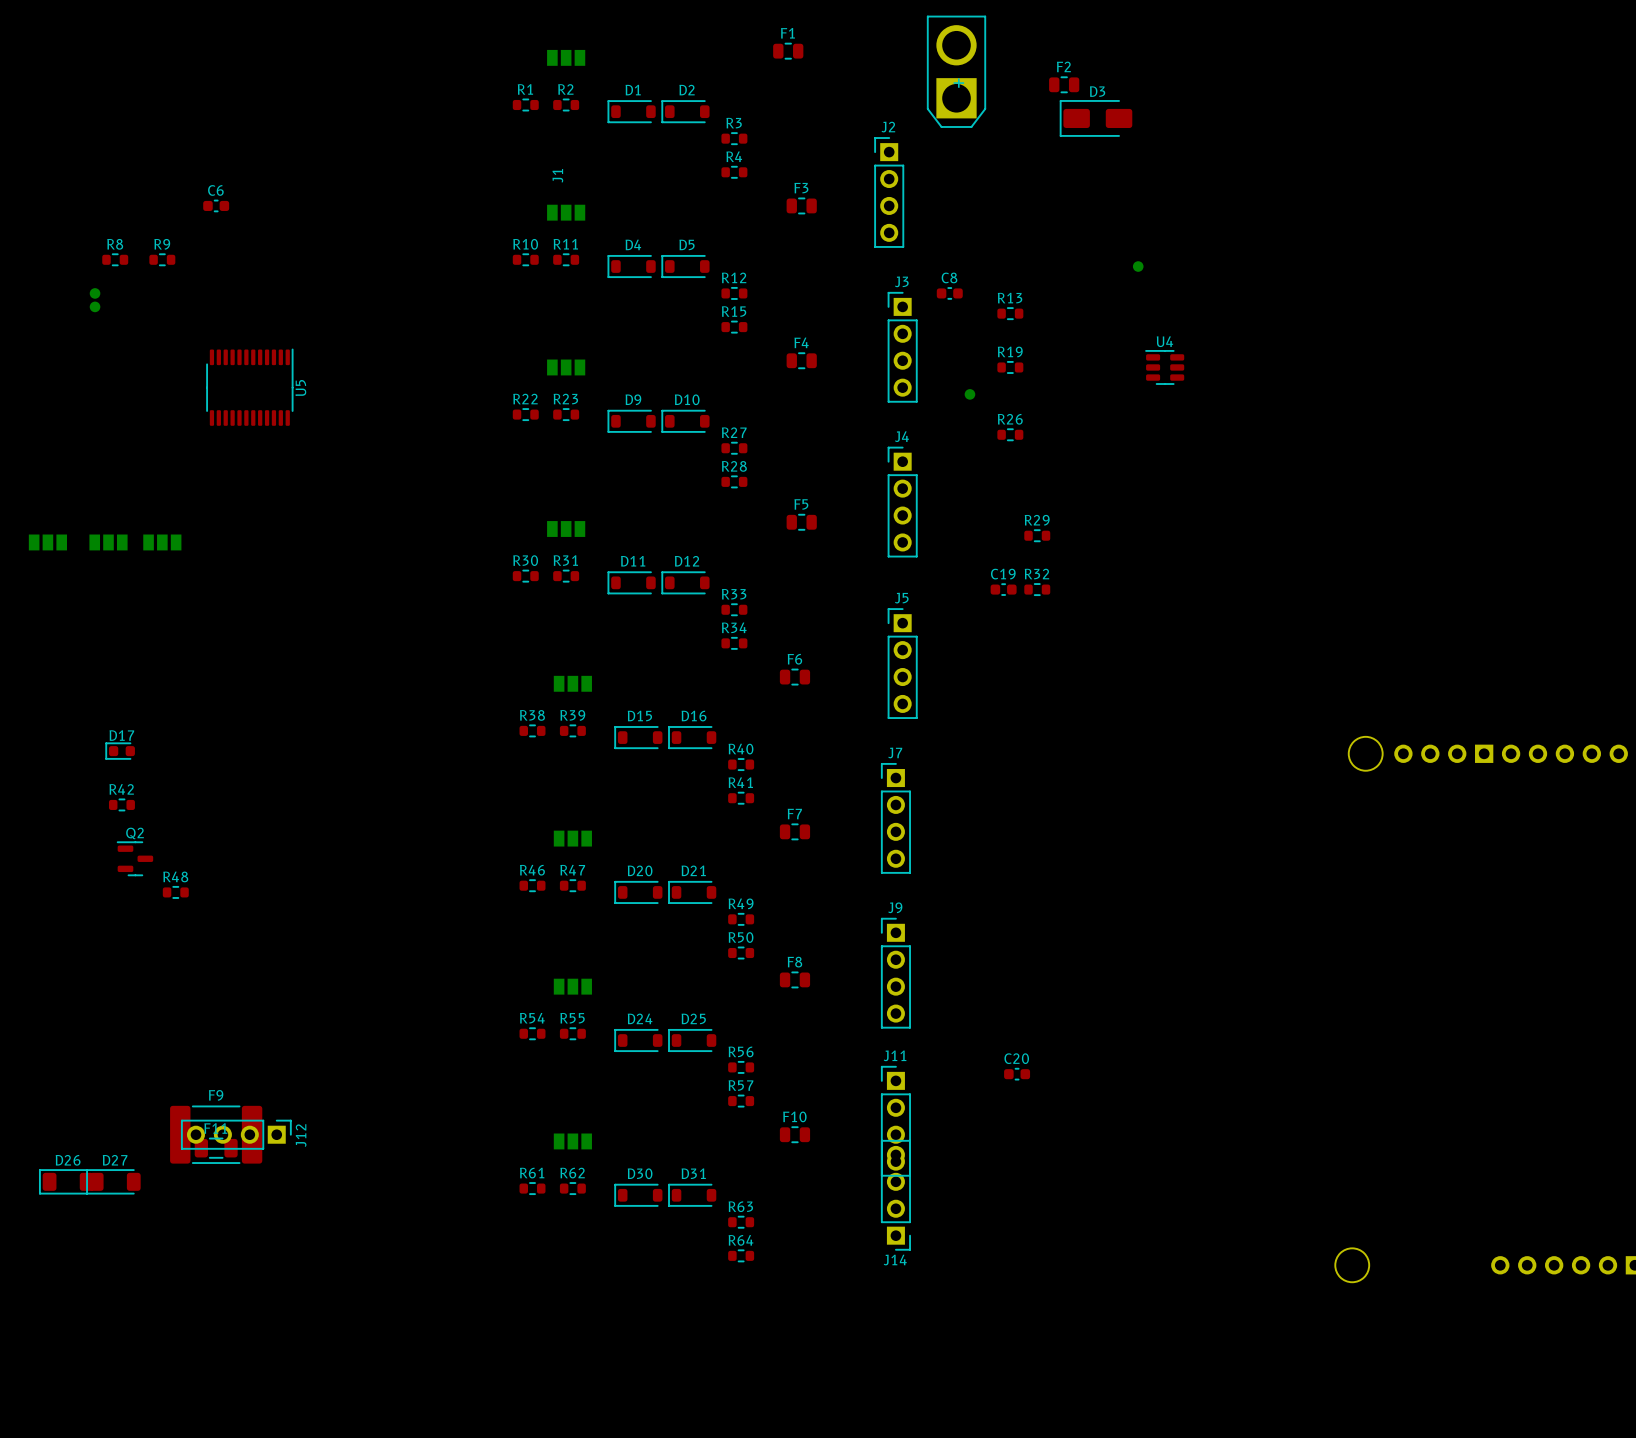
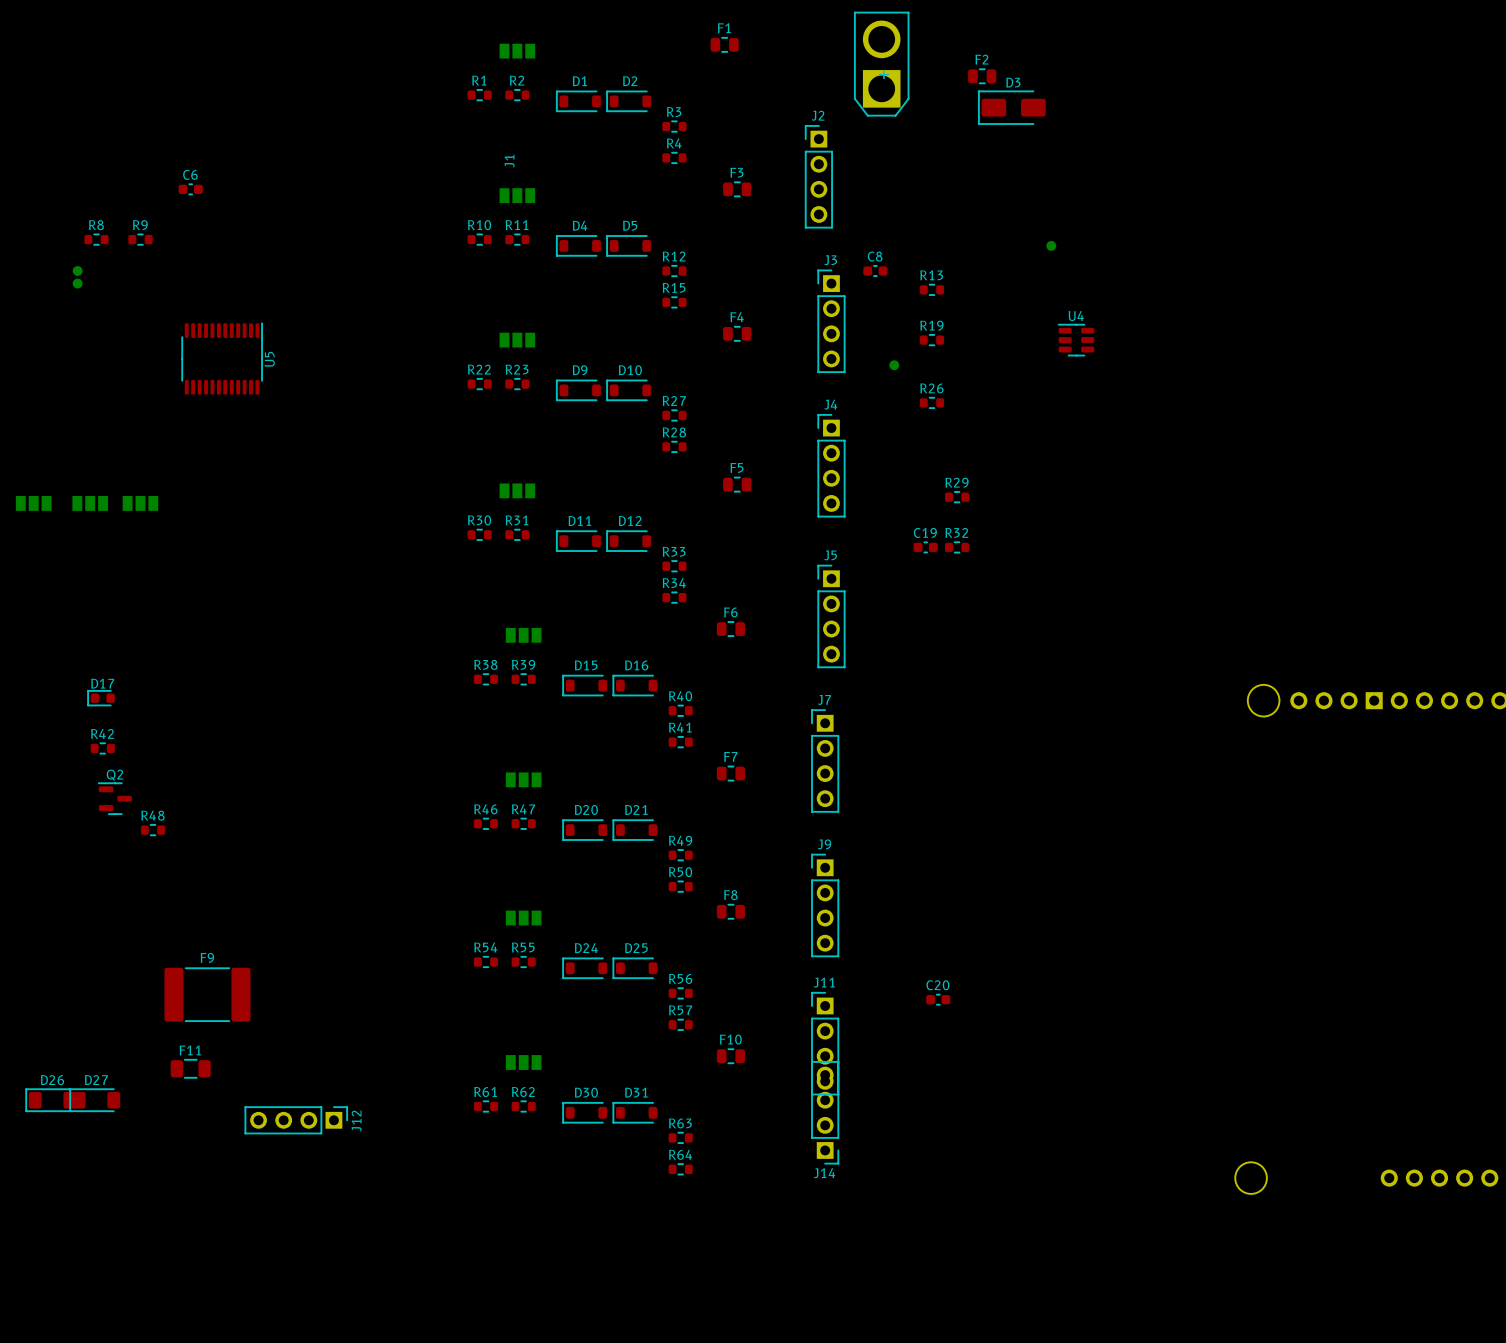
F9 position: (216, 1134) -> (207, 994)
J12 position: (236, 1134) -> (296, 1120)

